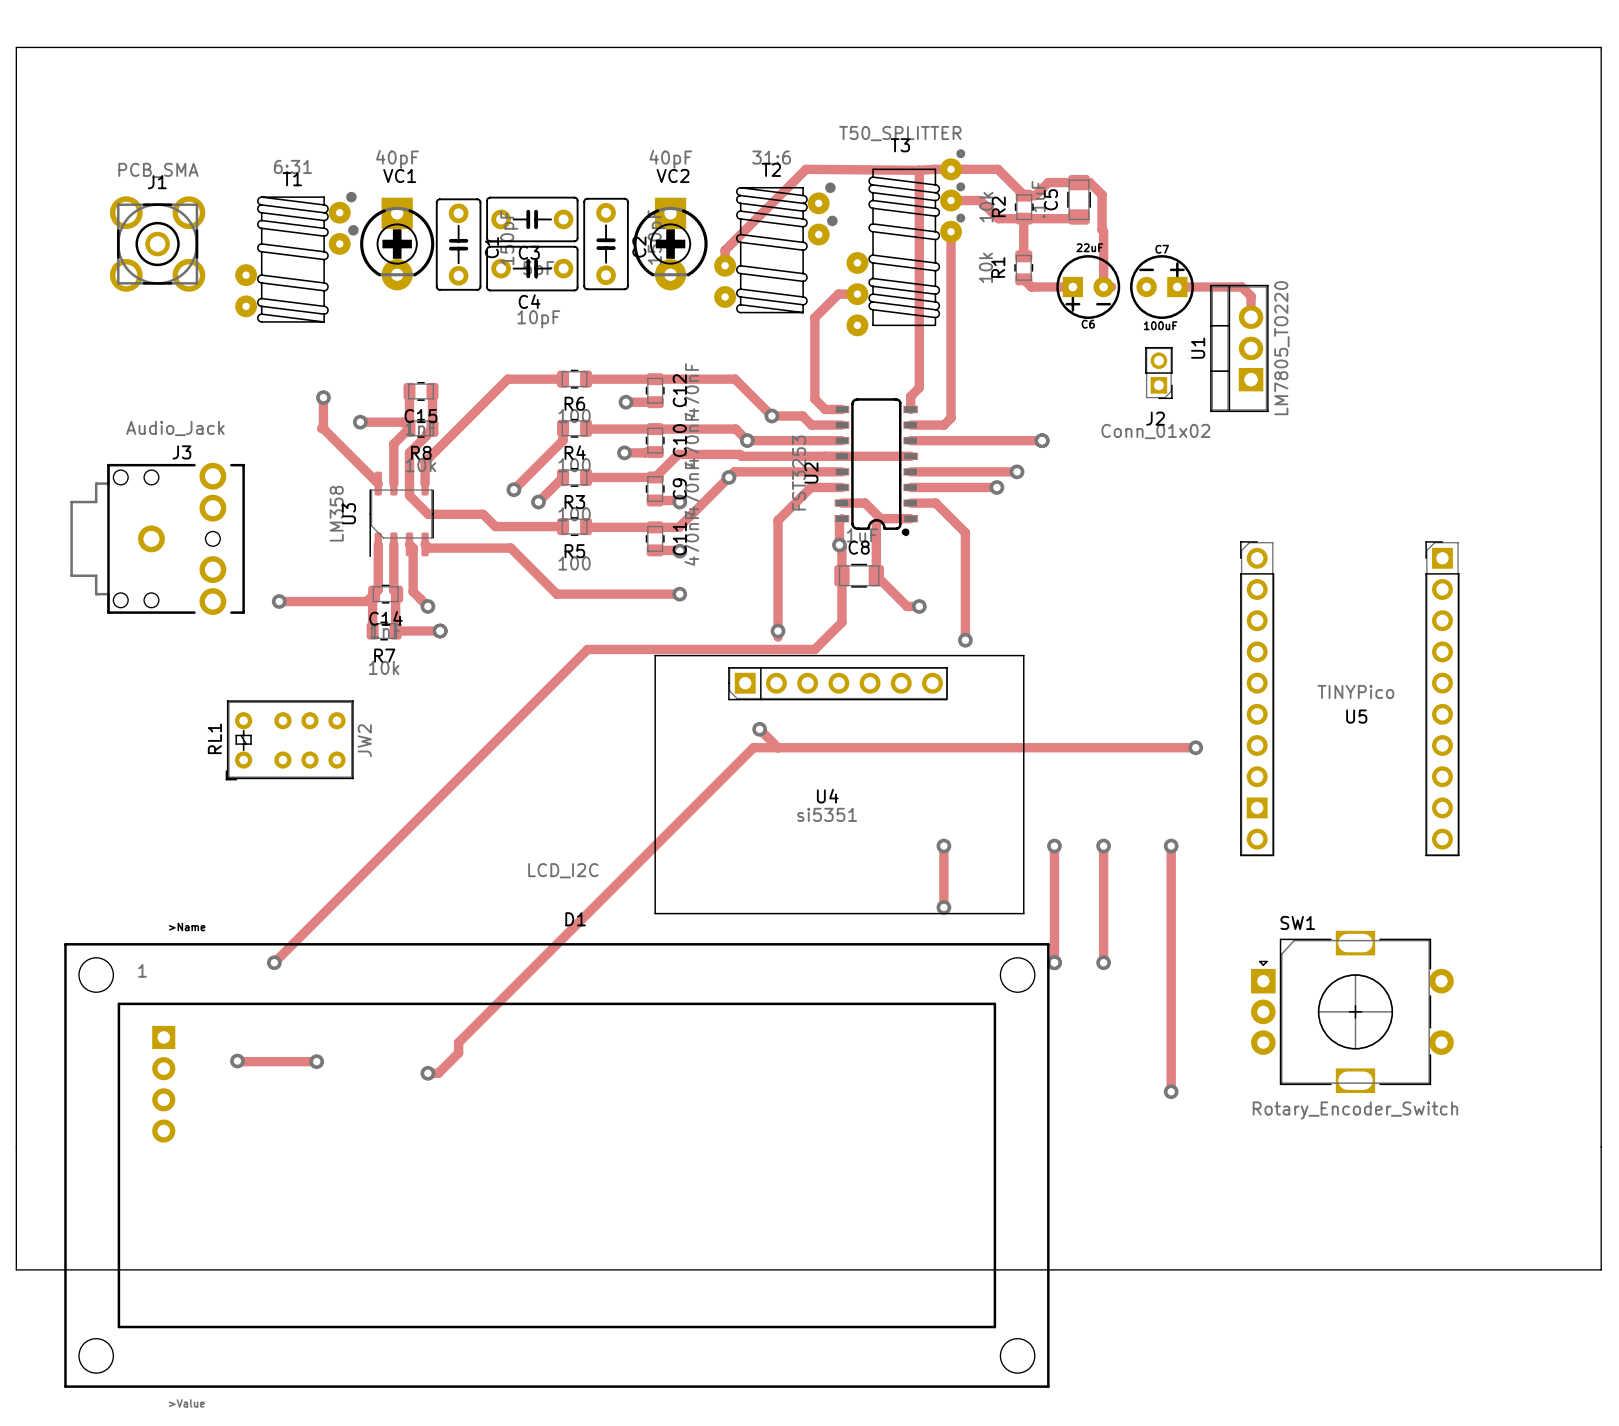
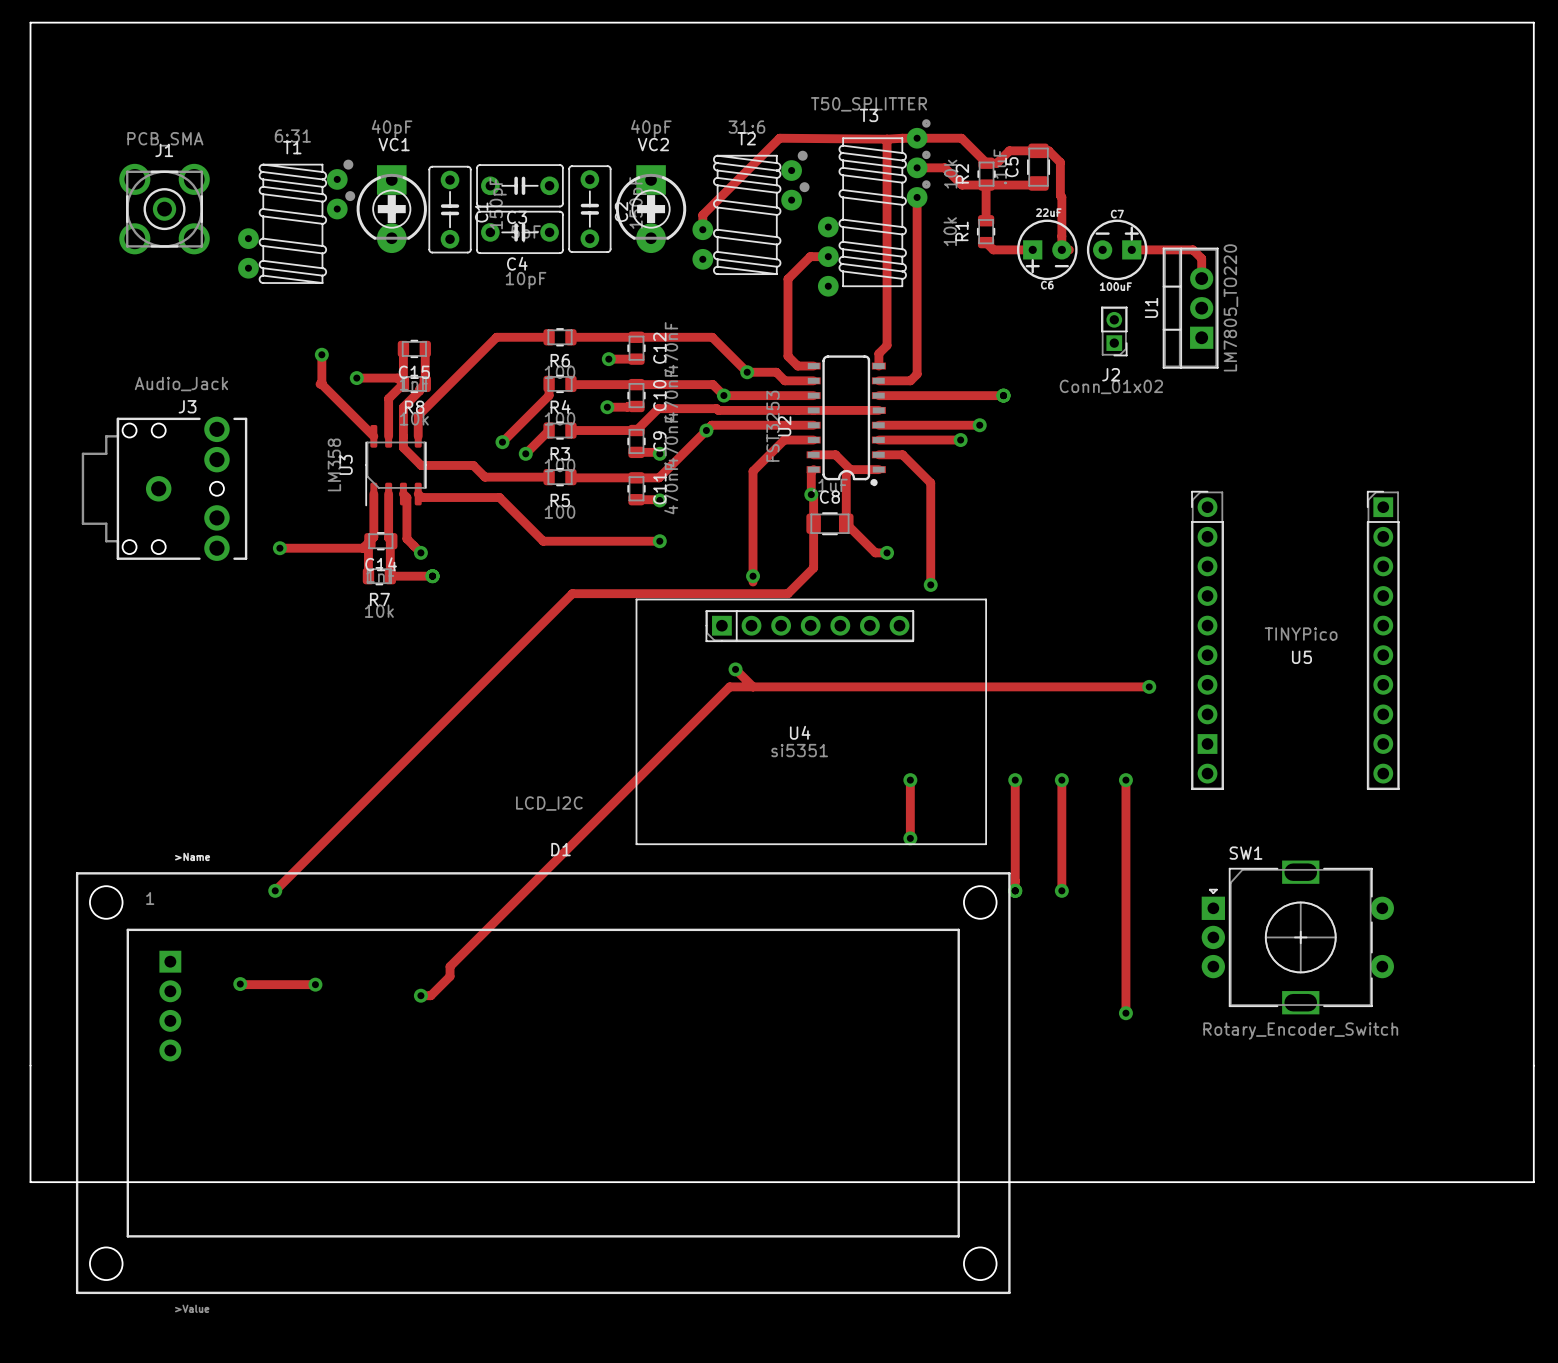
RL1: JW2 (289, 740) -> none

